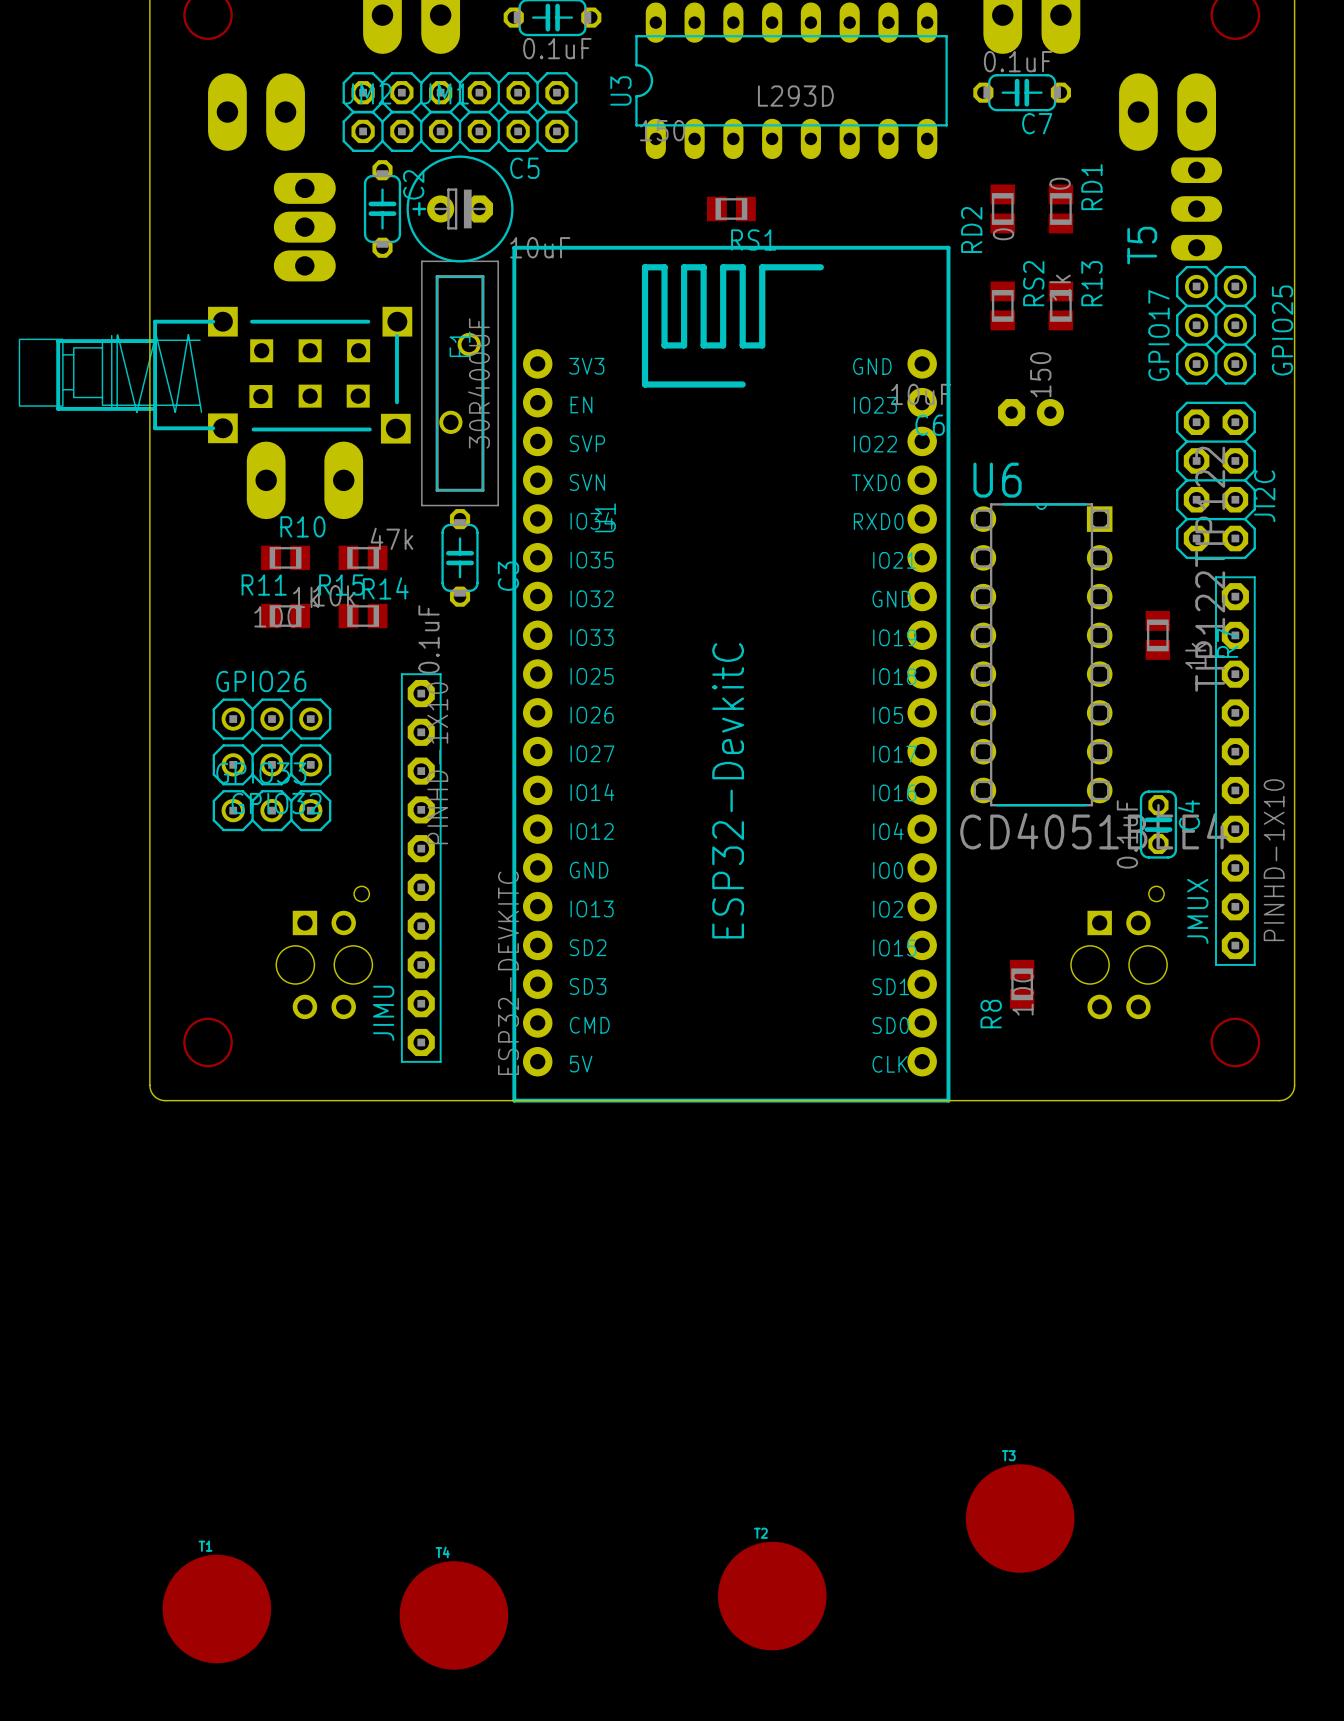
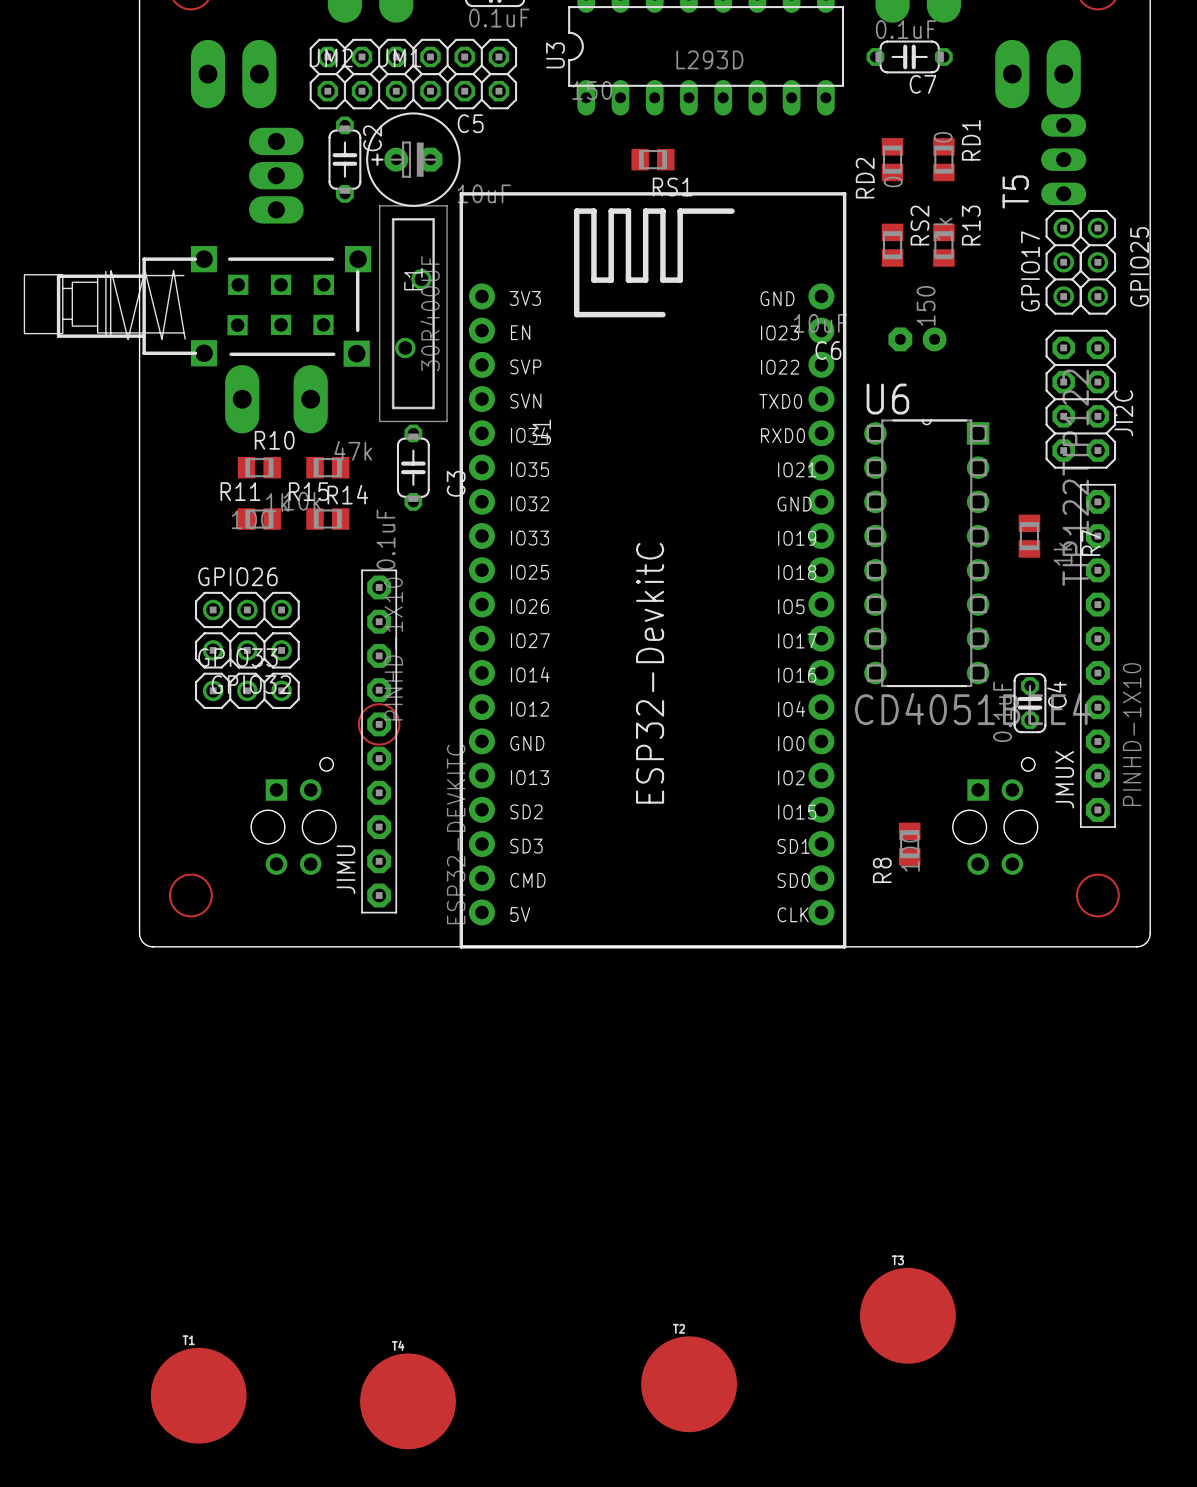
drawing: none -> [357, 703, 401, 746]

